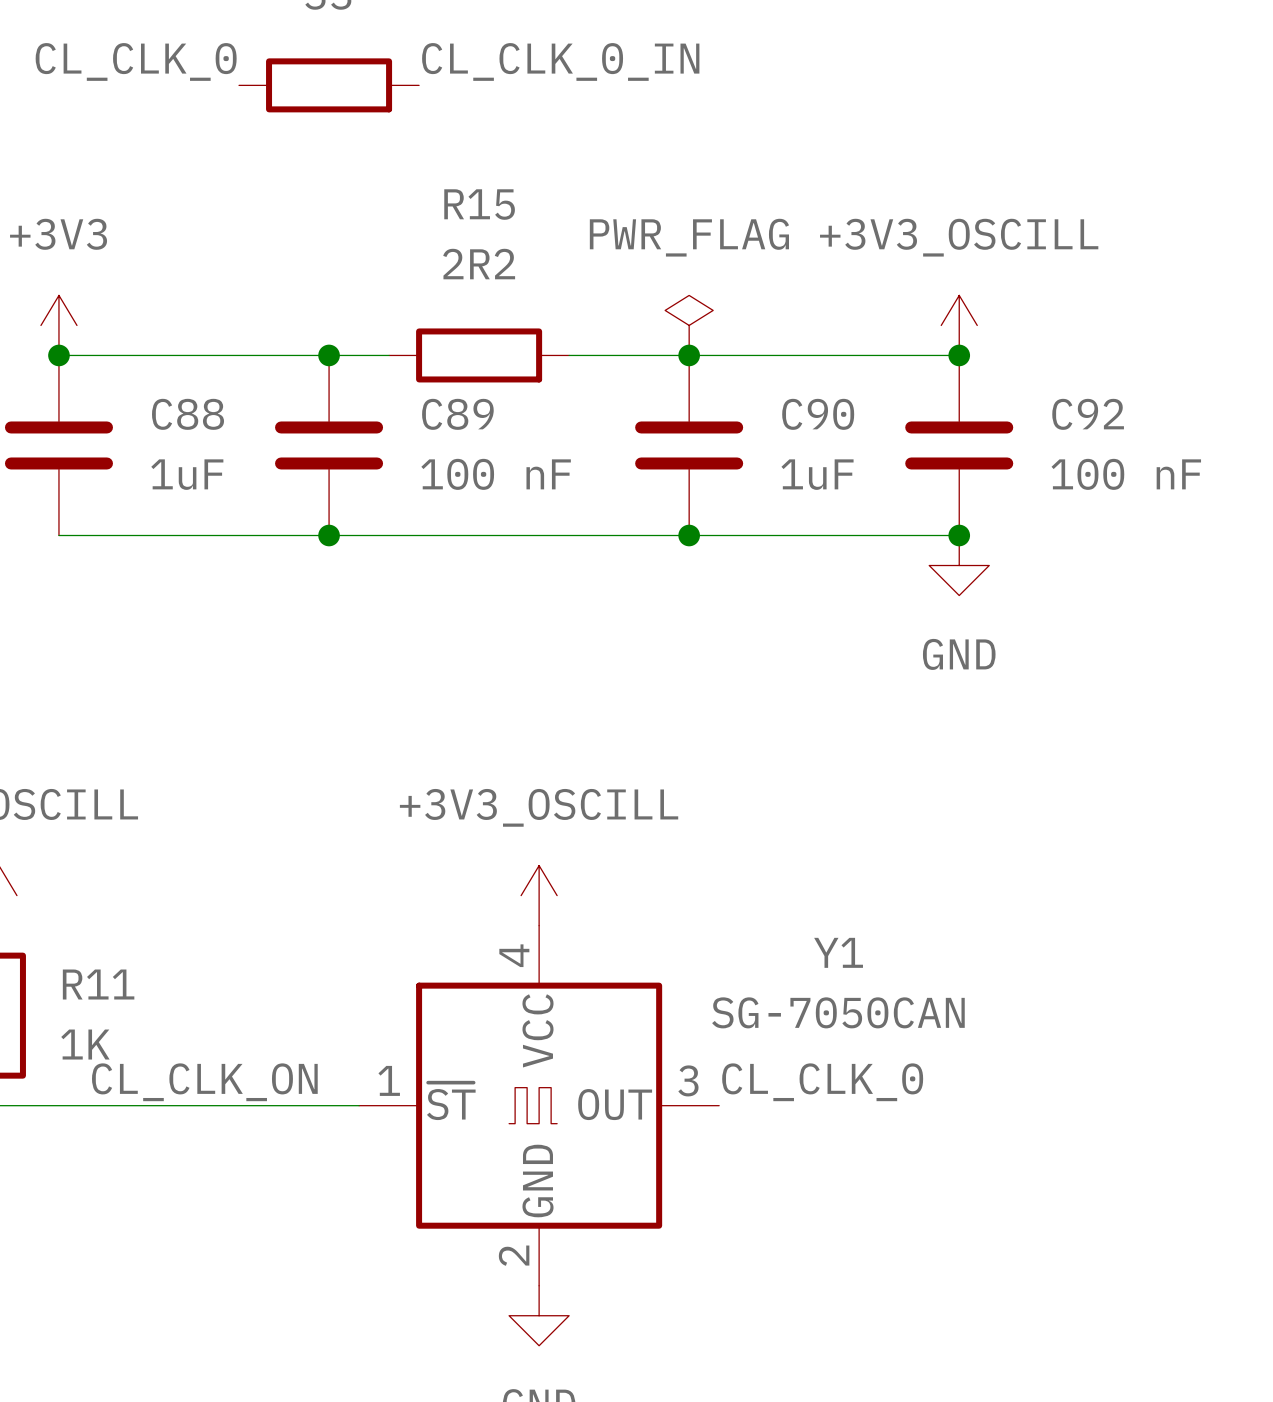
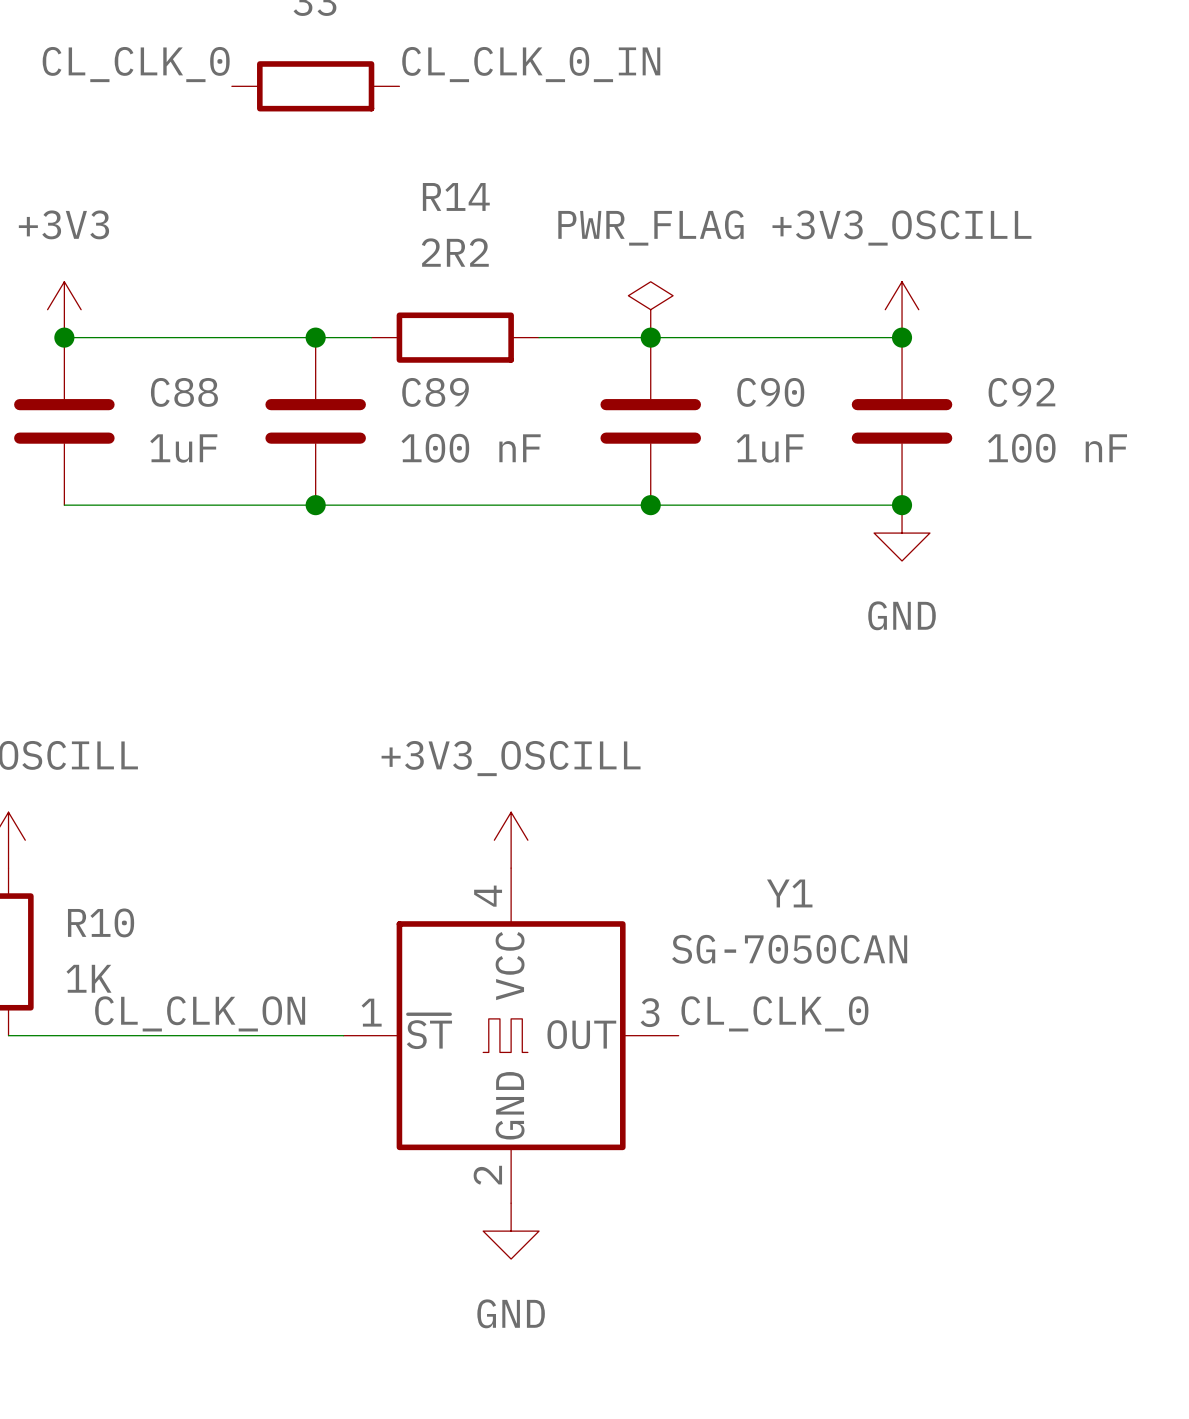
R15 name: R15 (479, 204) -> R14 (456, 196)
R11 name: R11 (98, 984) -> R10 (101, 922)

